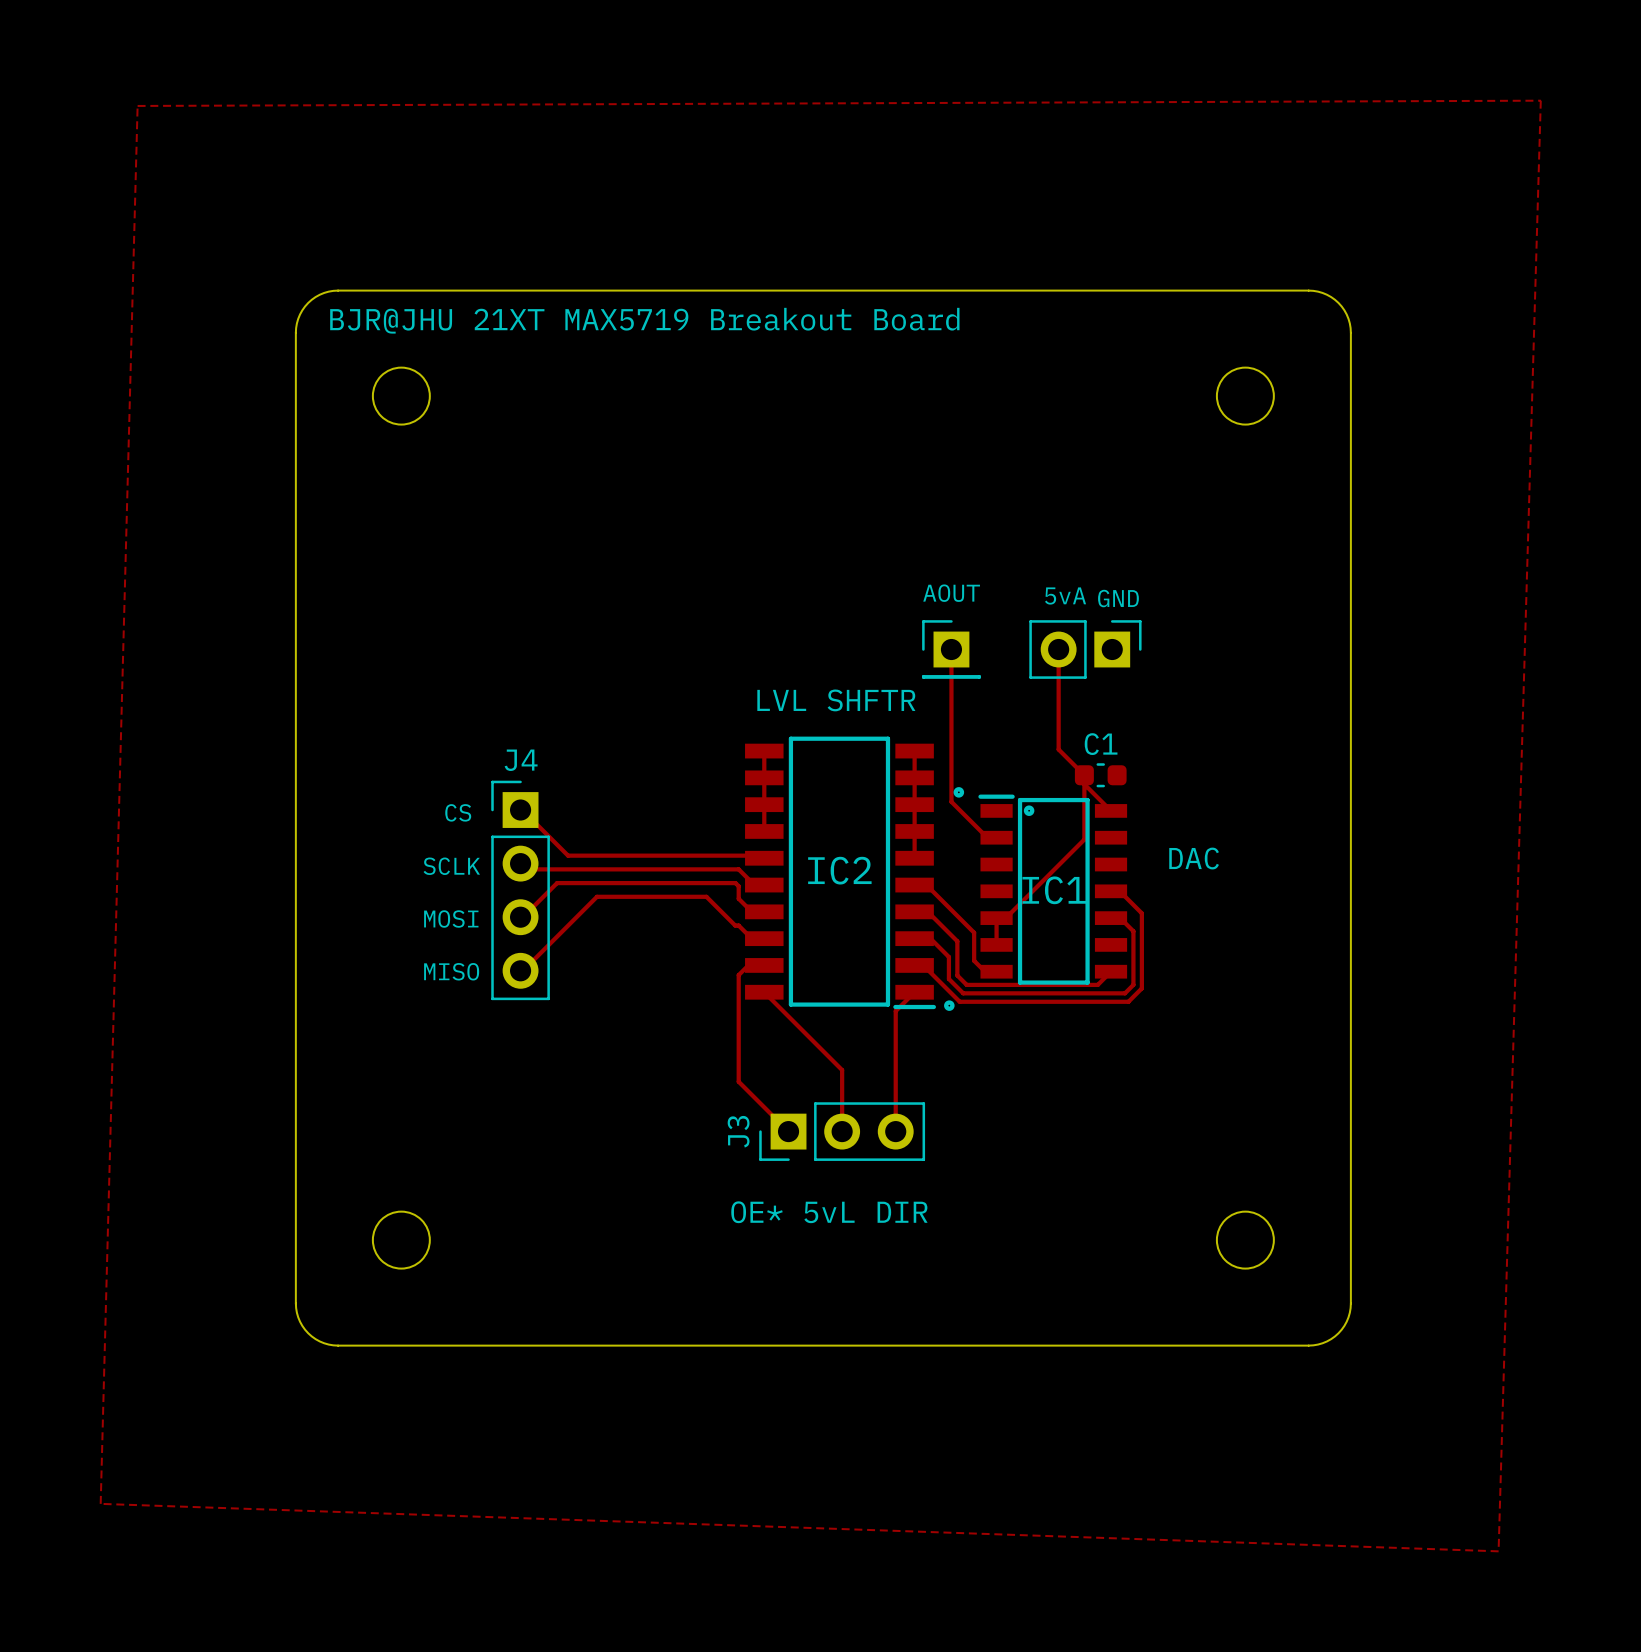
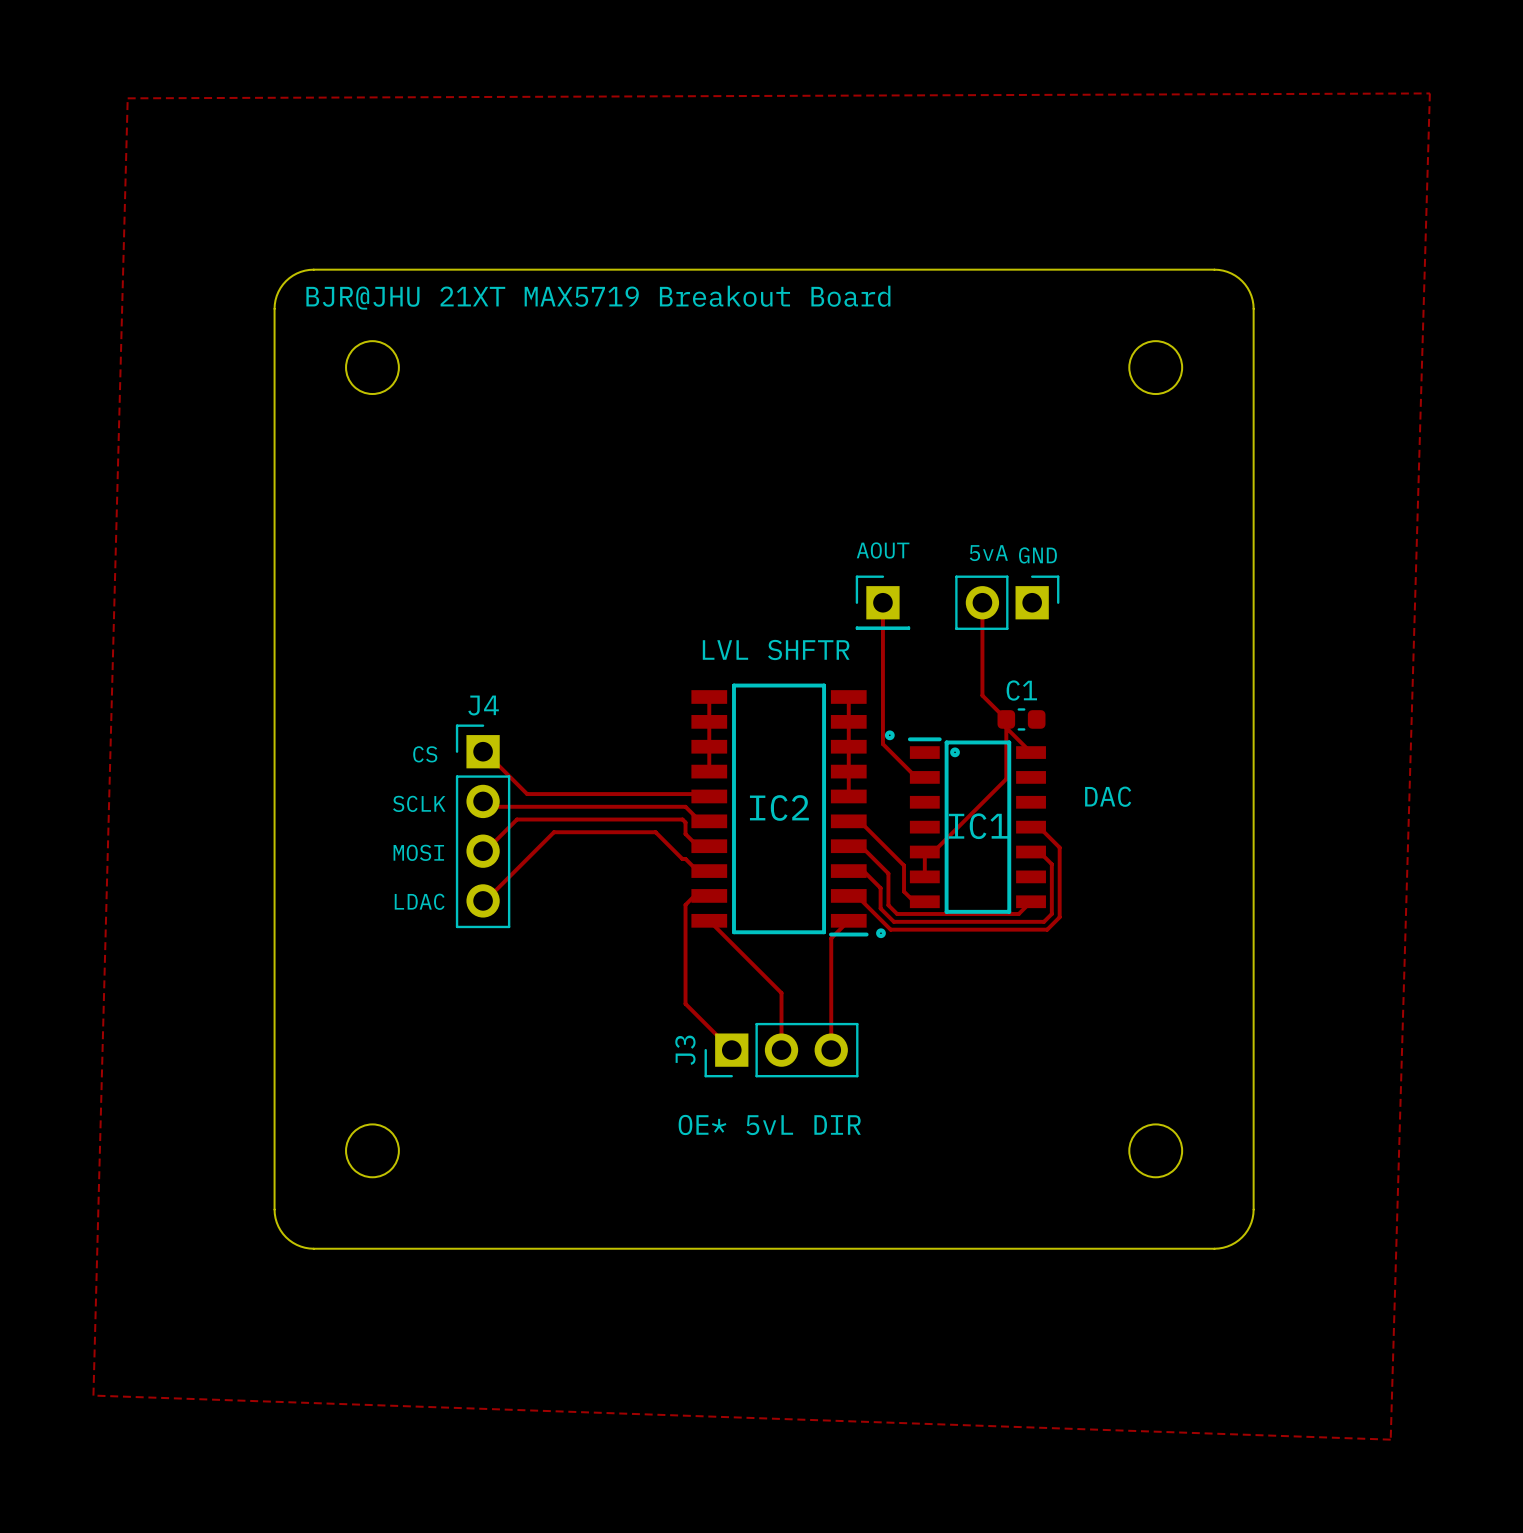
text: MISO (451, 971) -> LDAC (419, 901)

